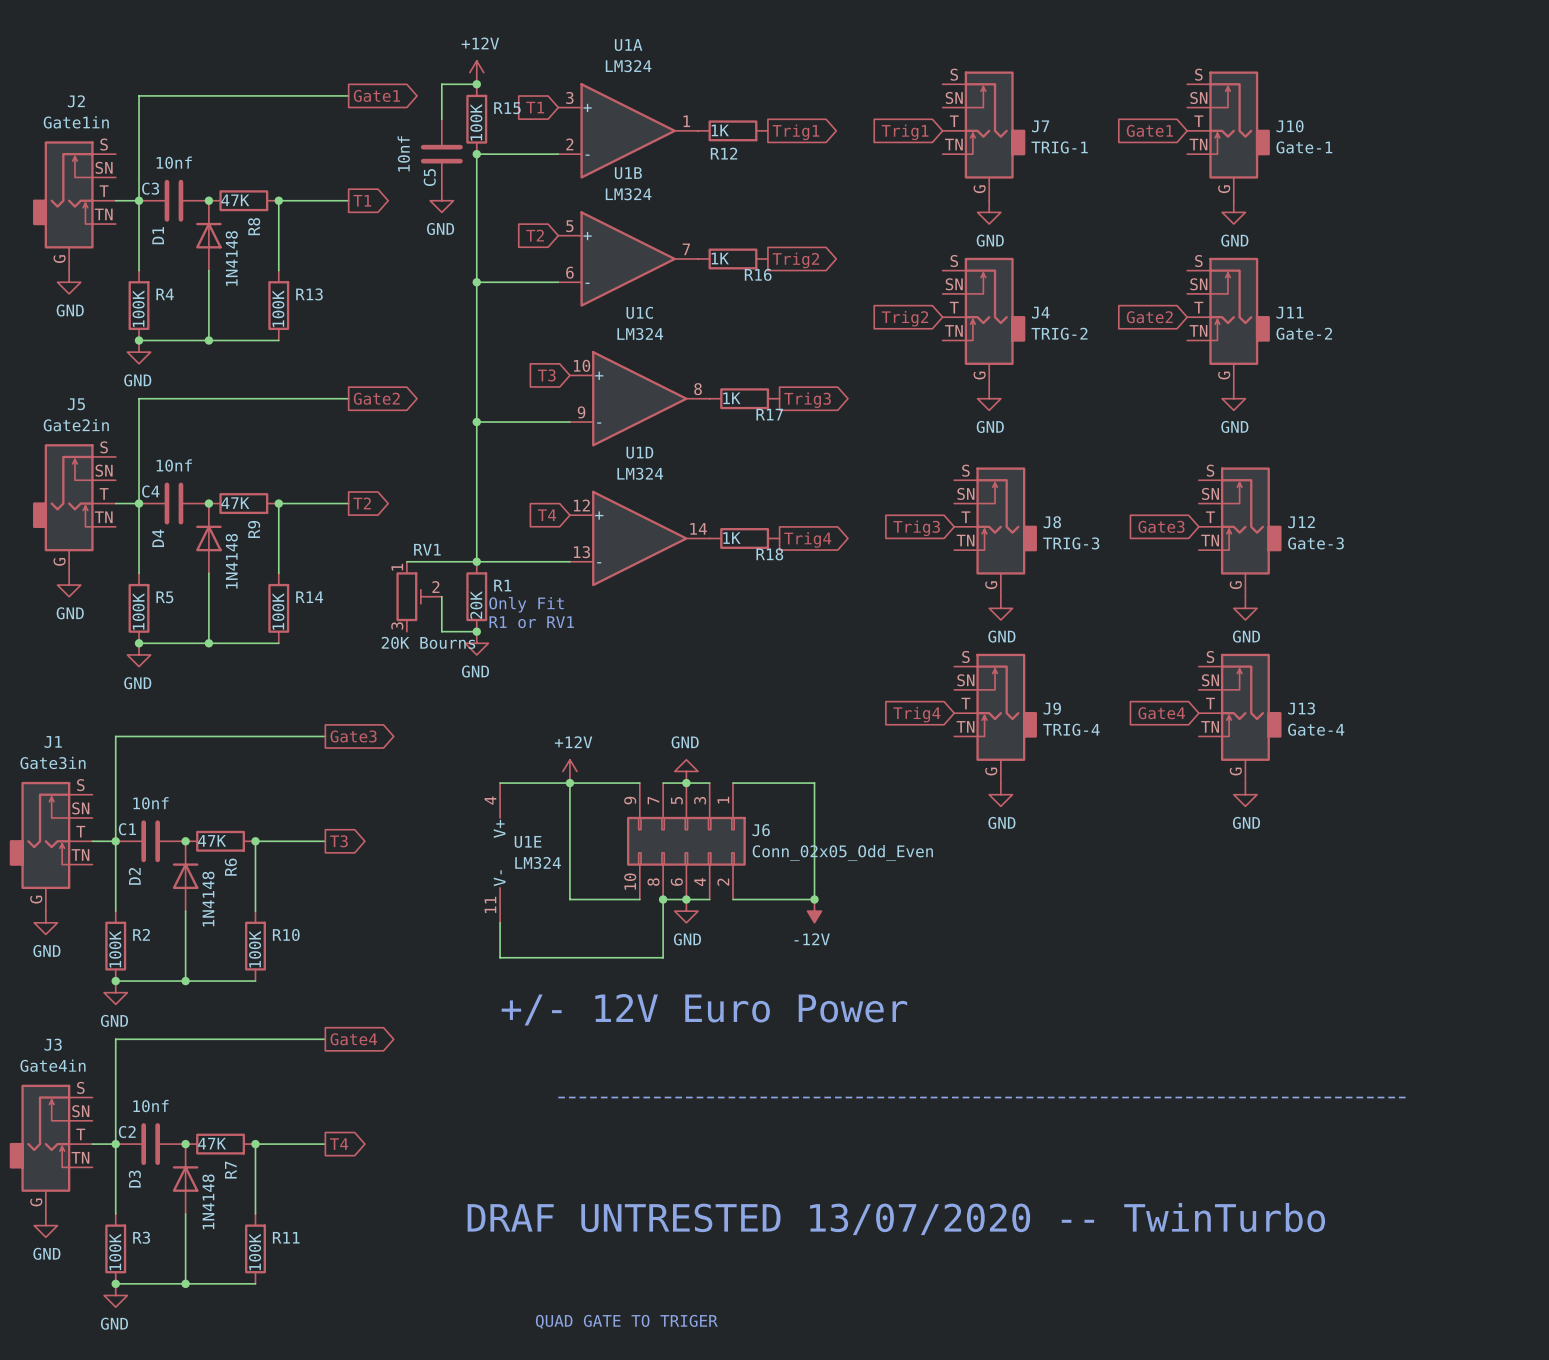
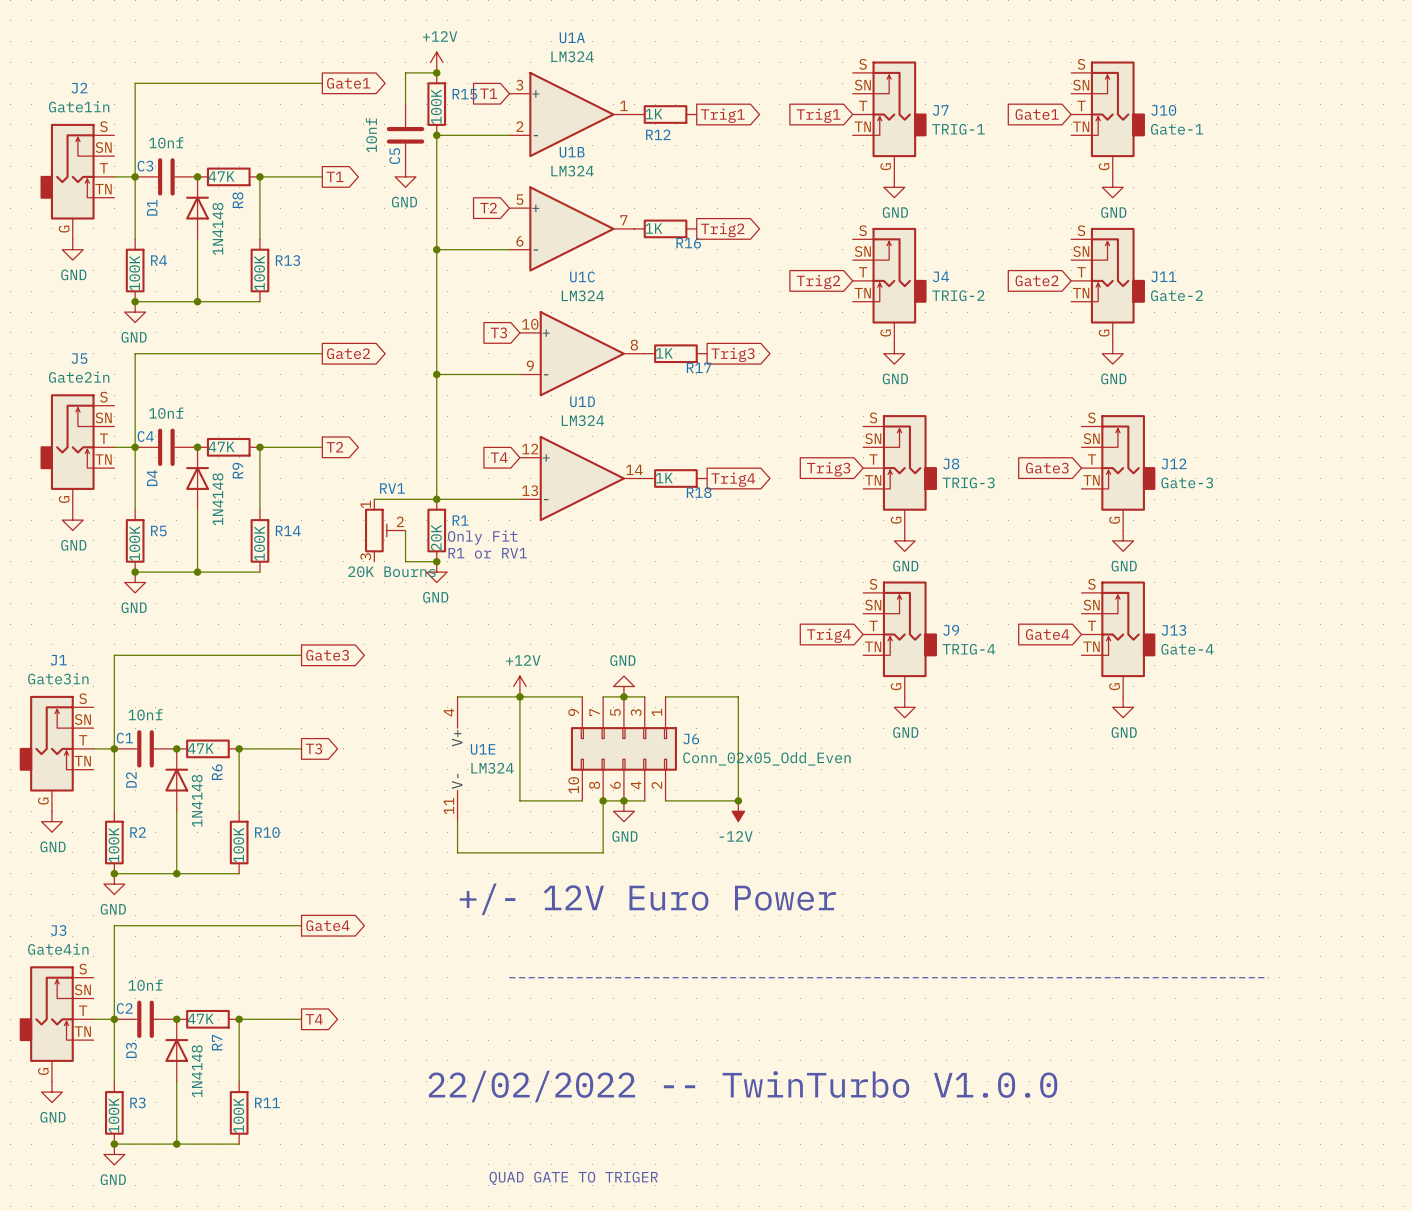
text: DRAF UNTRESTED 13/07/2020 -- TwinTurbo (896, 1219) -> 22/02/2022 -- TwinTurbo V1.0.0 (742, 1086)

